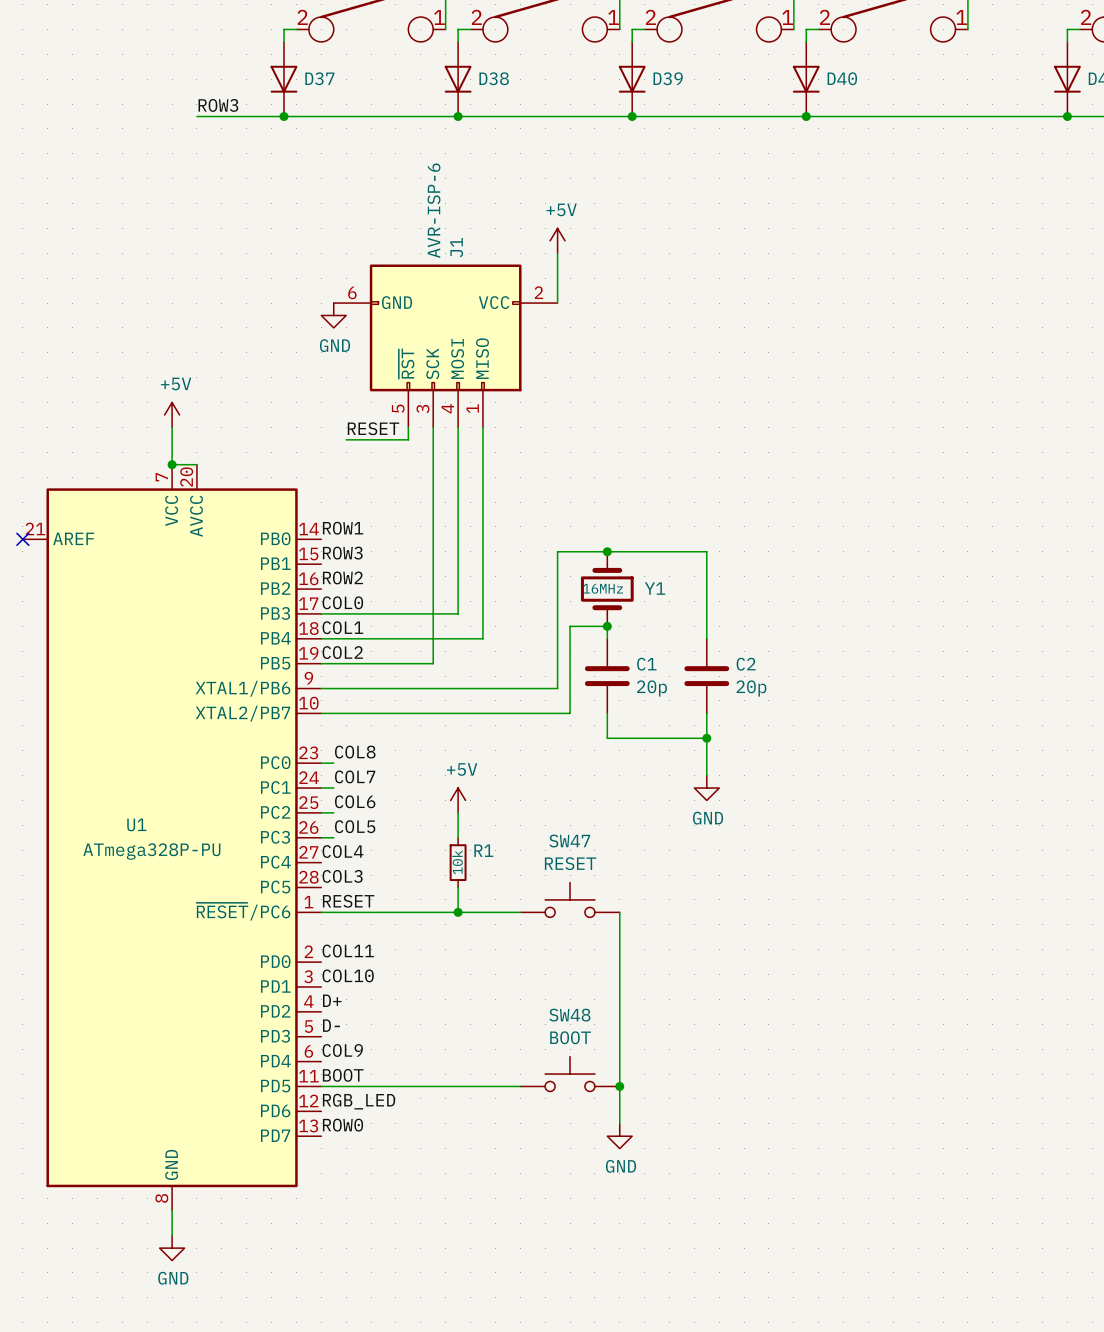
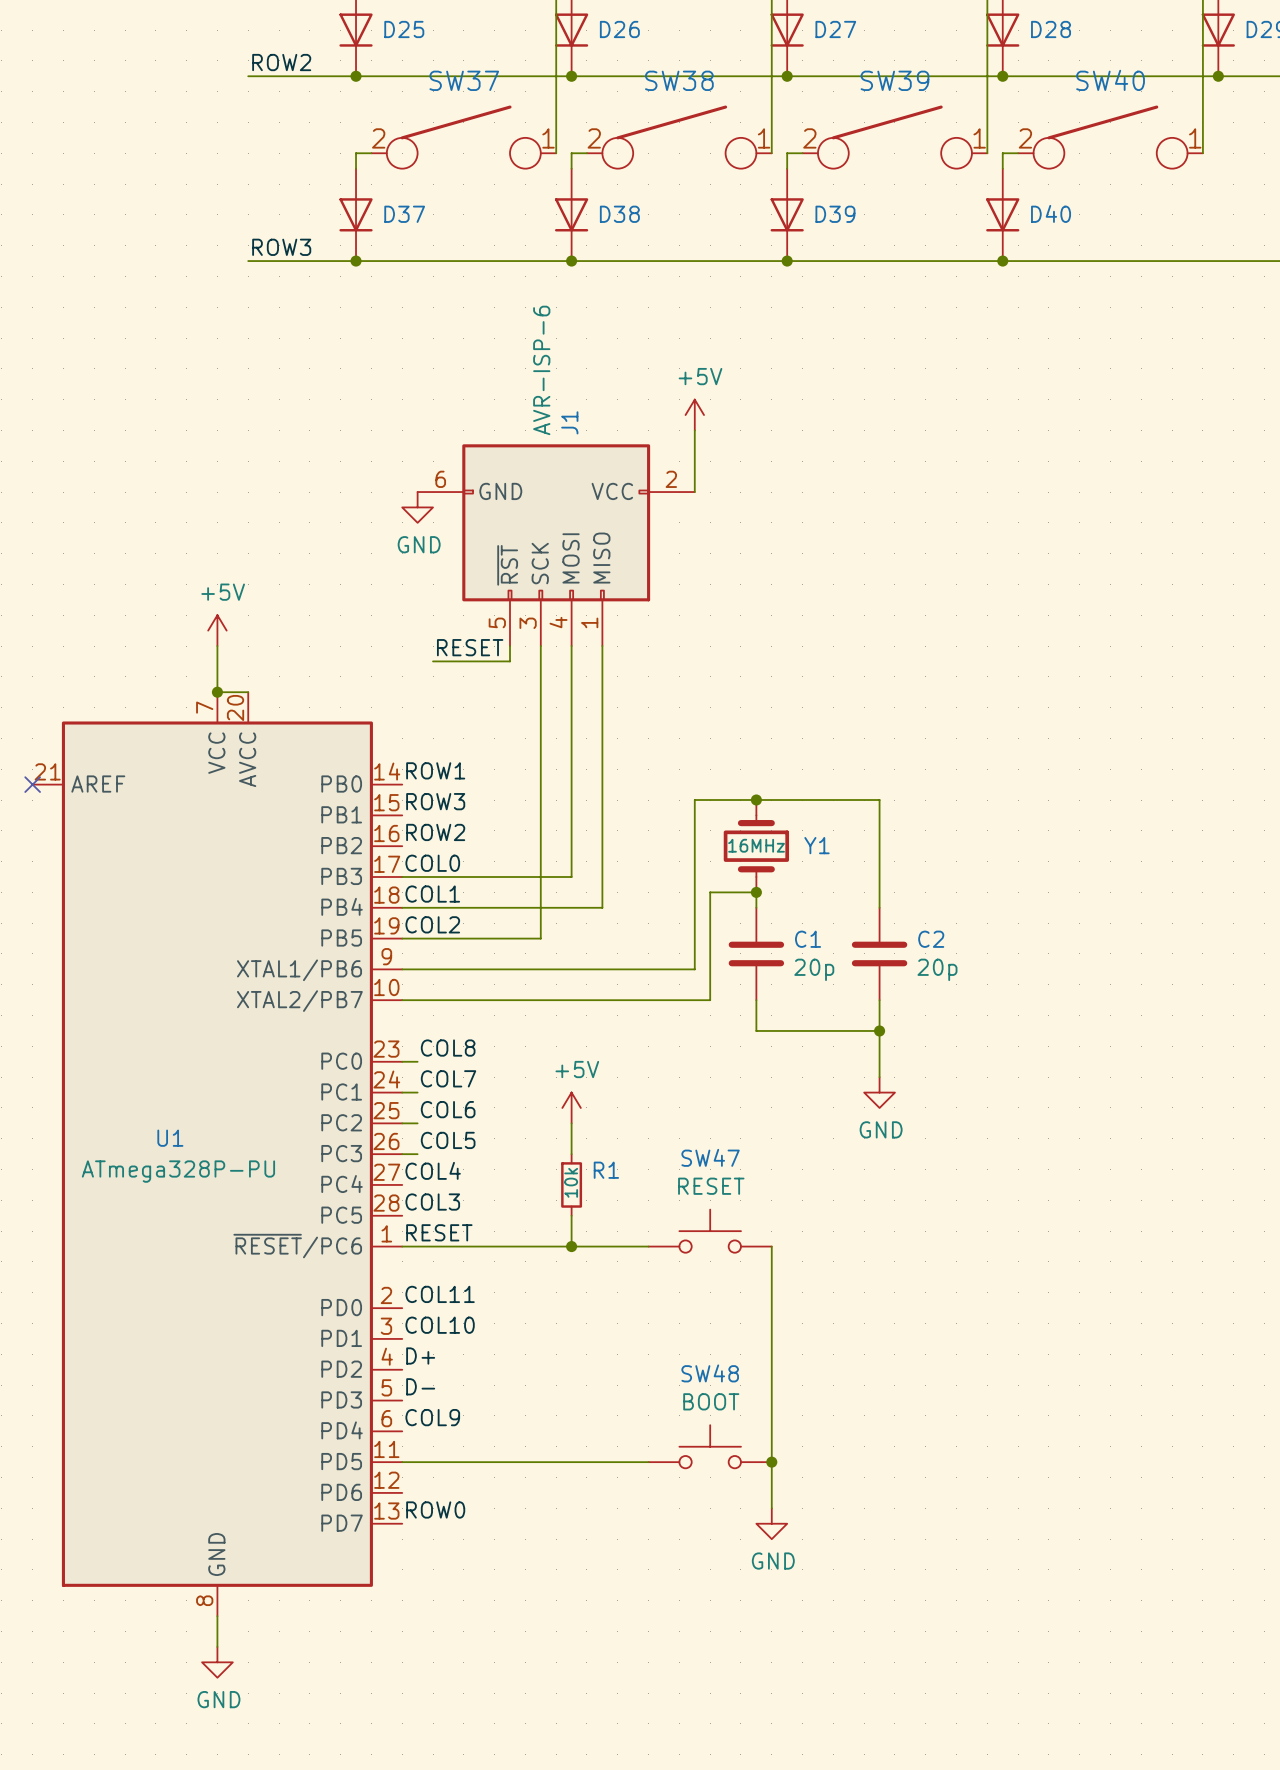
label: BOOT (343, 1075) -> none
label: RGB_LED (359, 1101) -> none

